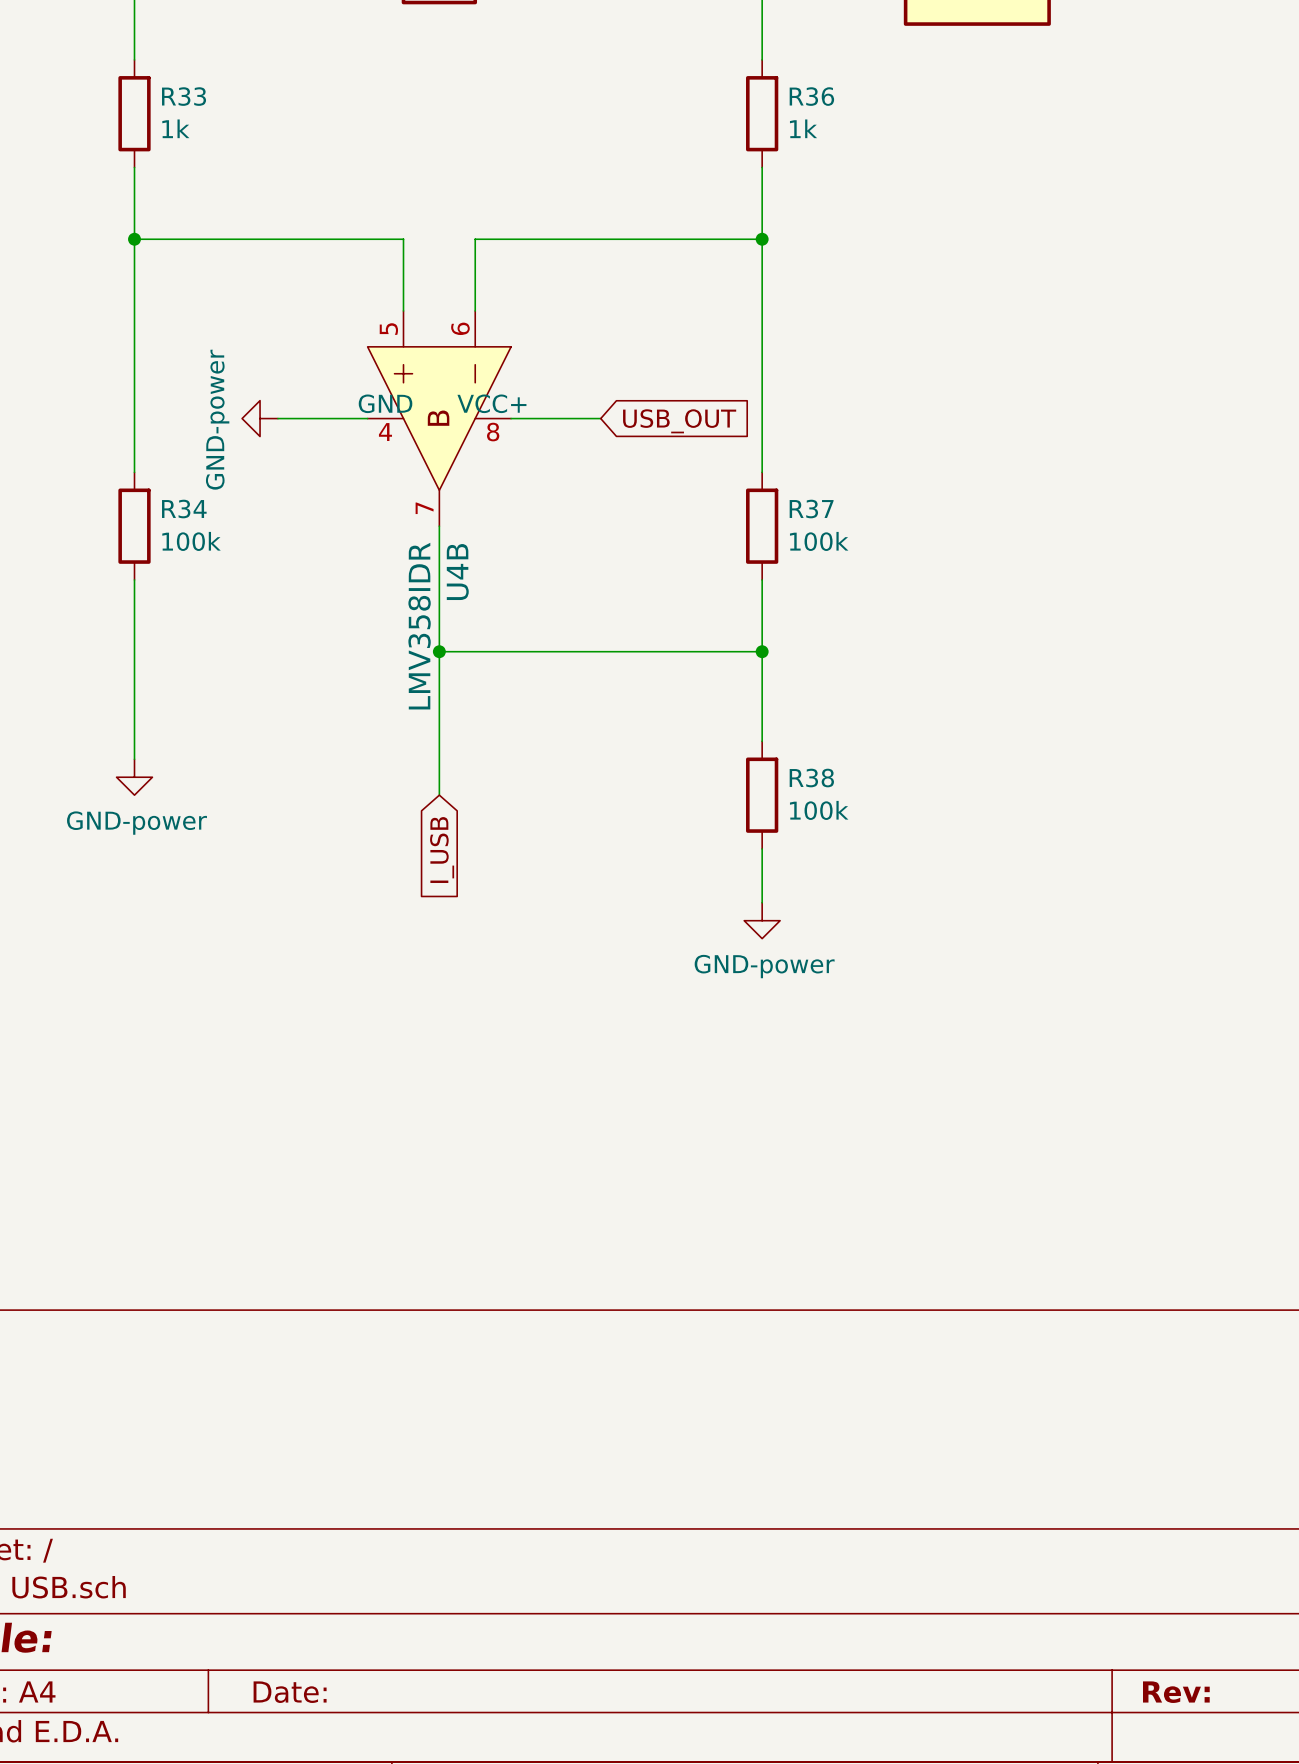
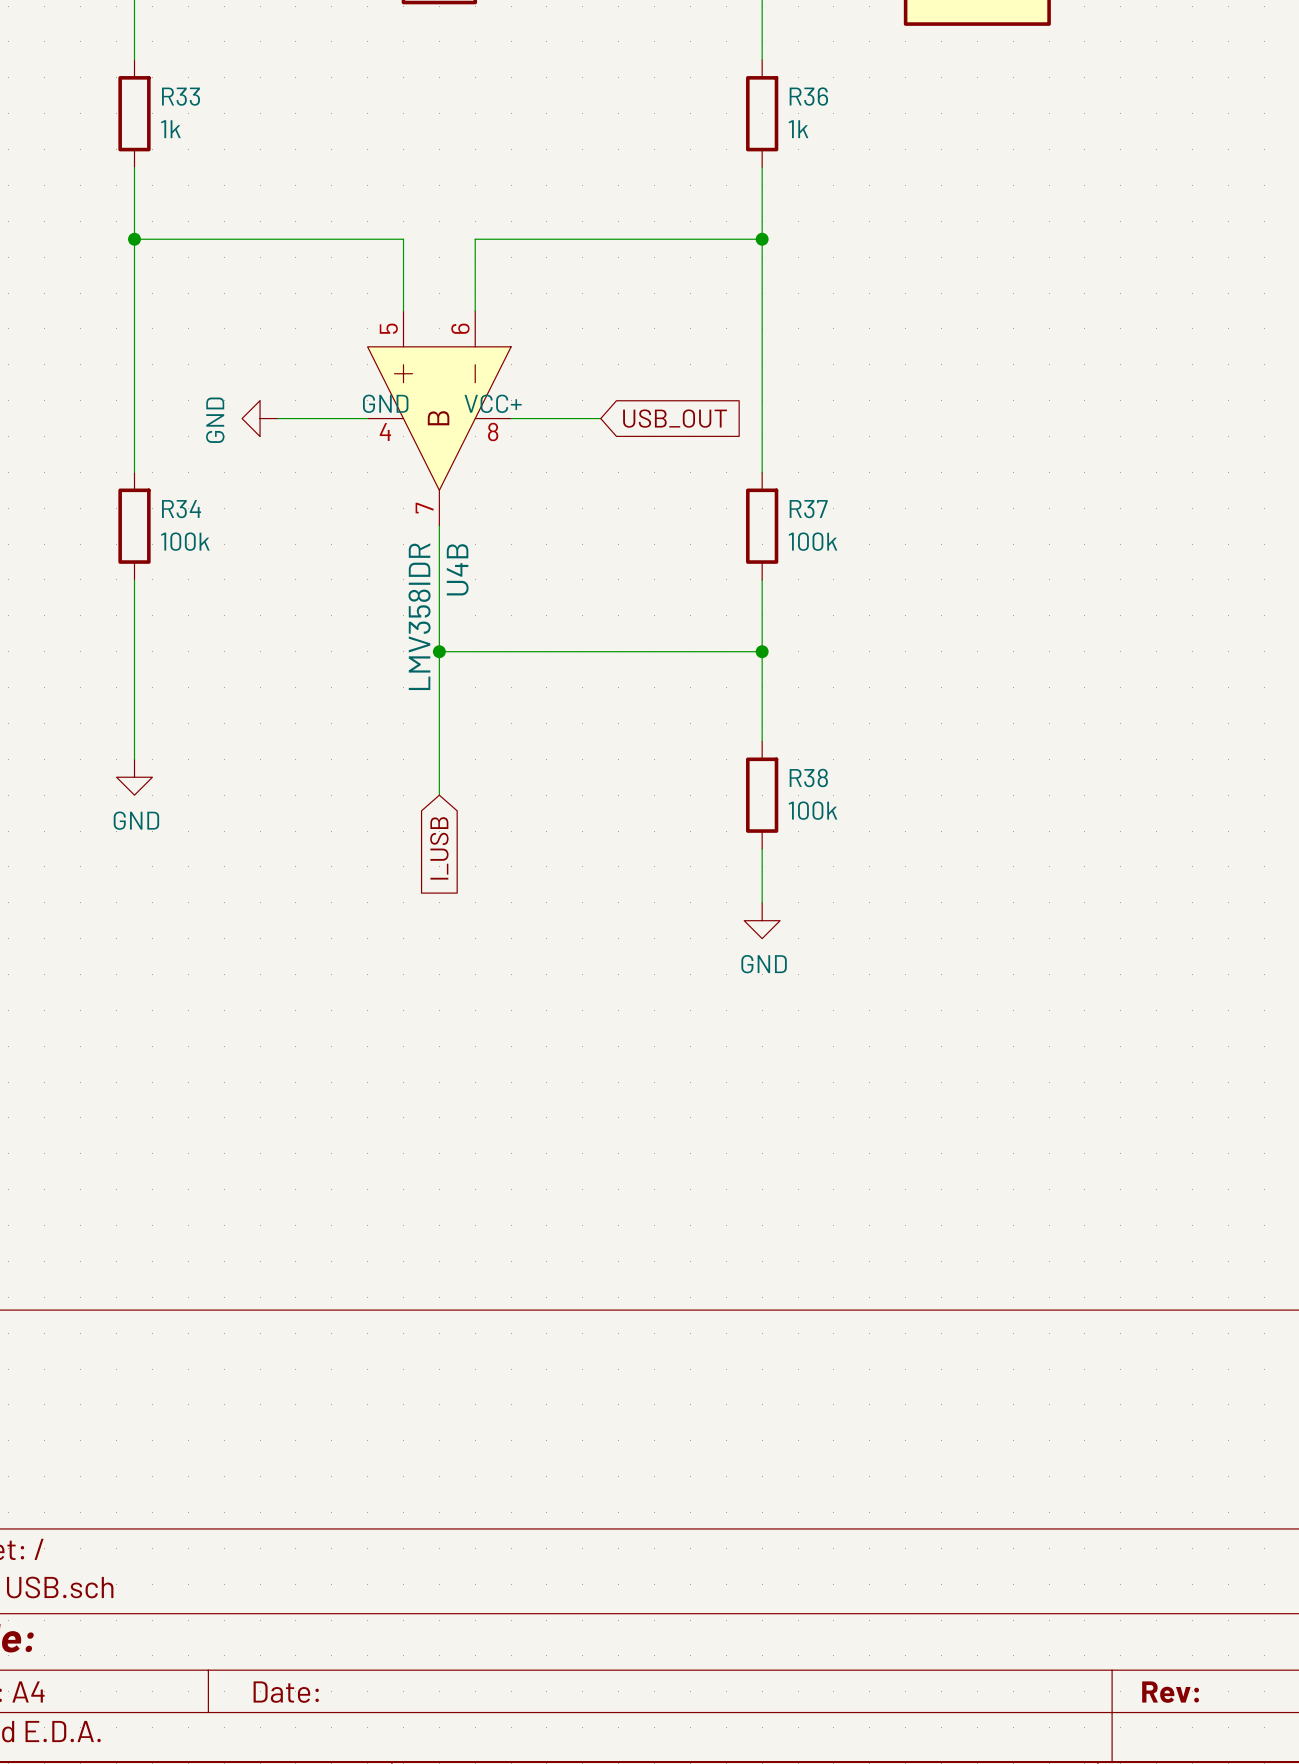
power symbol: GND-power (260, 418) -> GND (260, 418)
power symbol: GND-power (134, 777) -> GND (134, 777)
power symbol: GND-power (762, 920) -> GND (762, 920)

